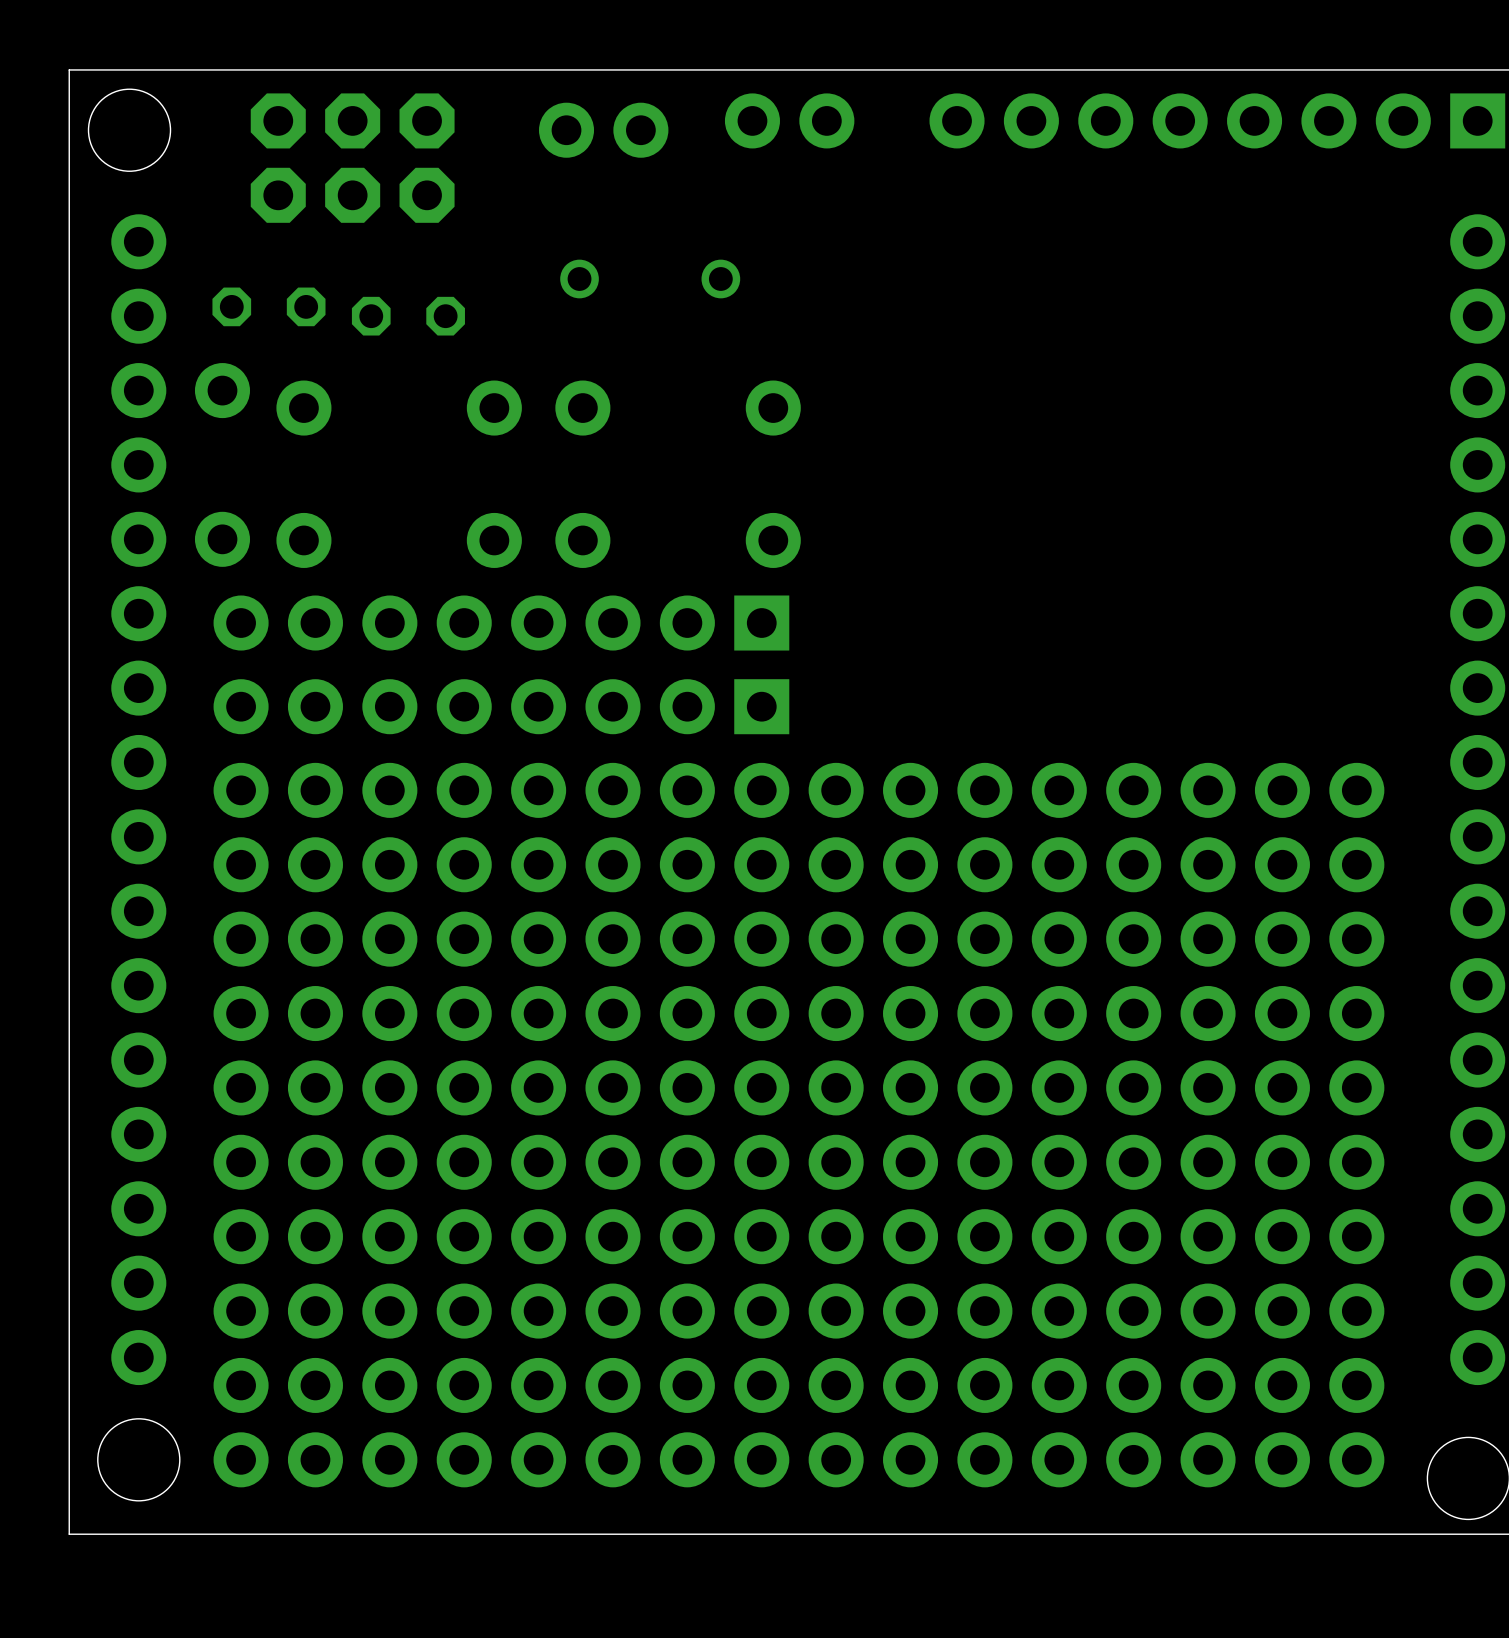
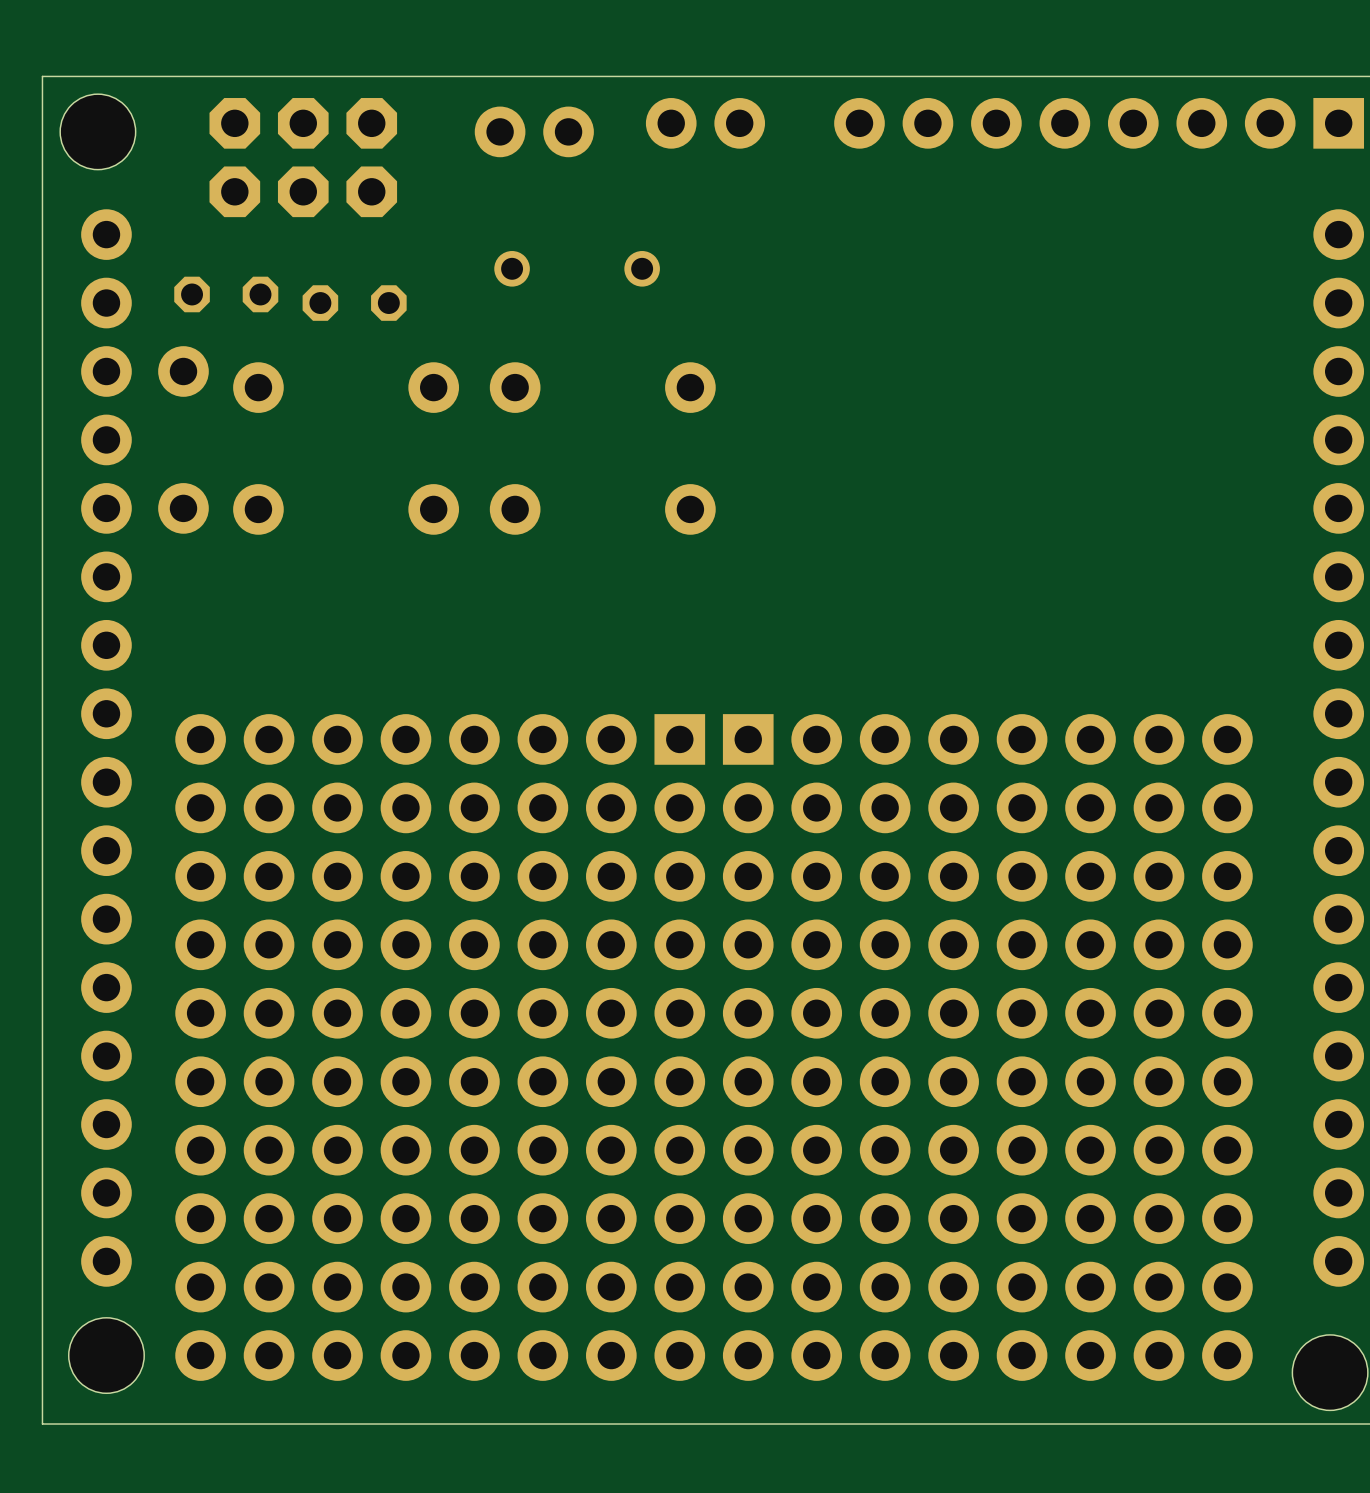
part: (501, 623) -> none
part: (501, 706) -> none
part: none -> (440, 739)
part: (798, 790) -> none
part: none -> (987, 739)

